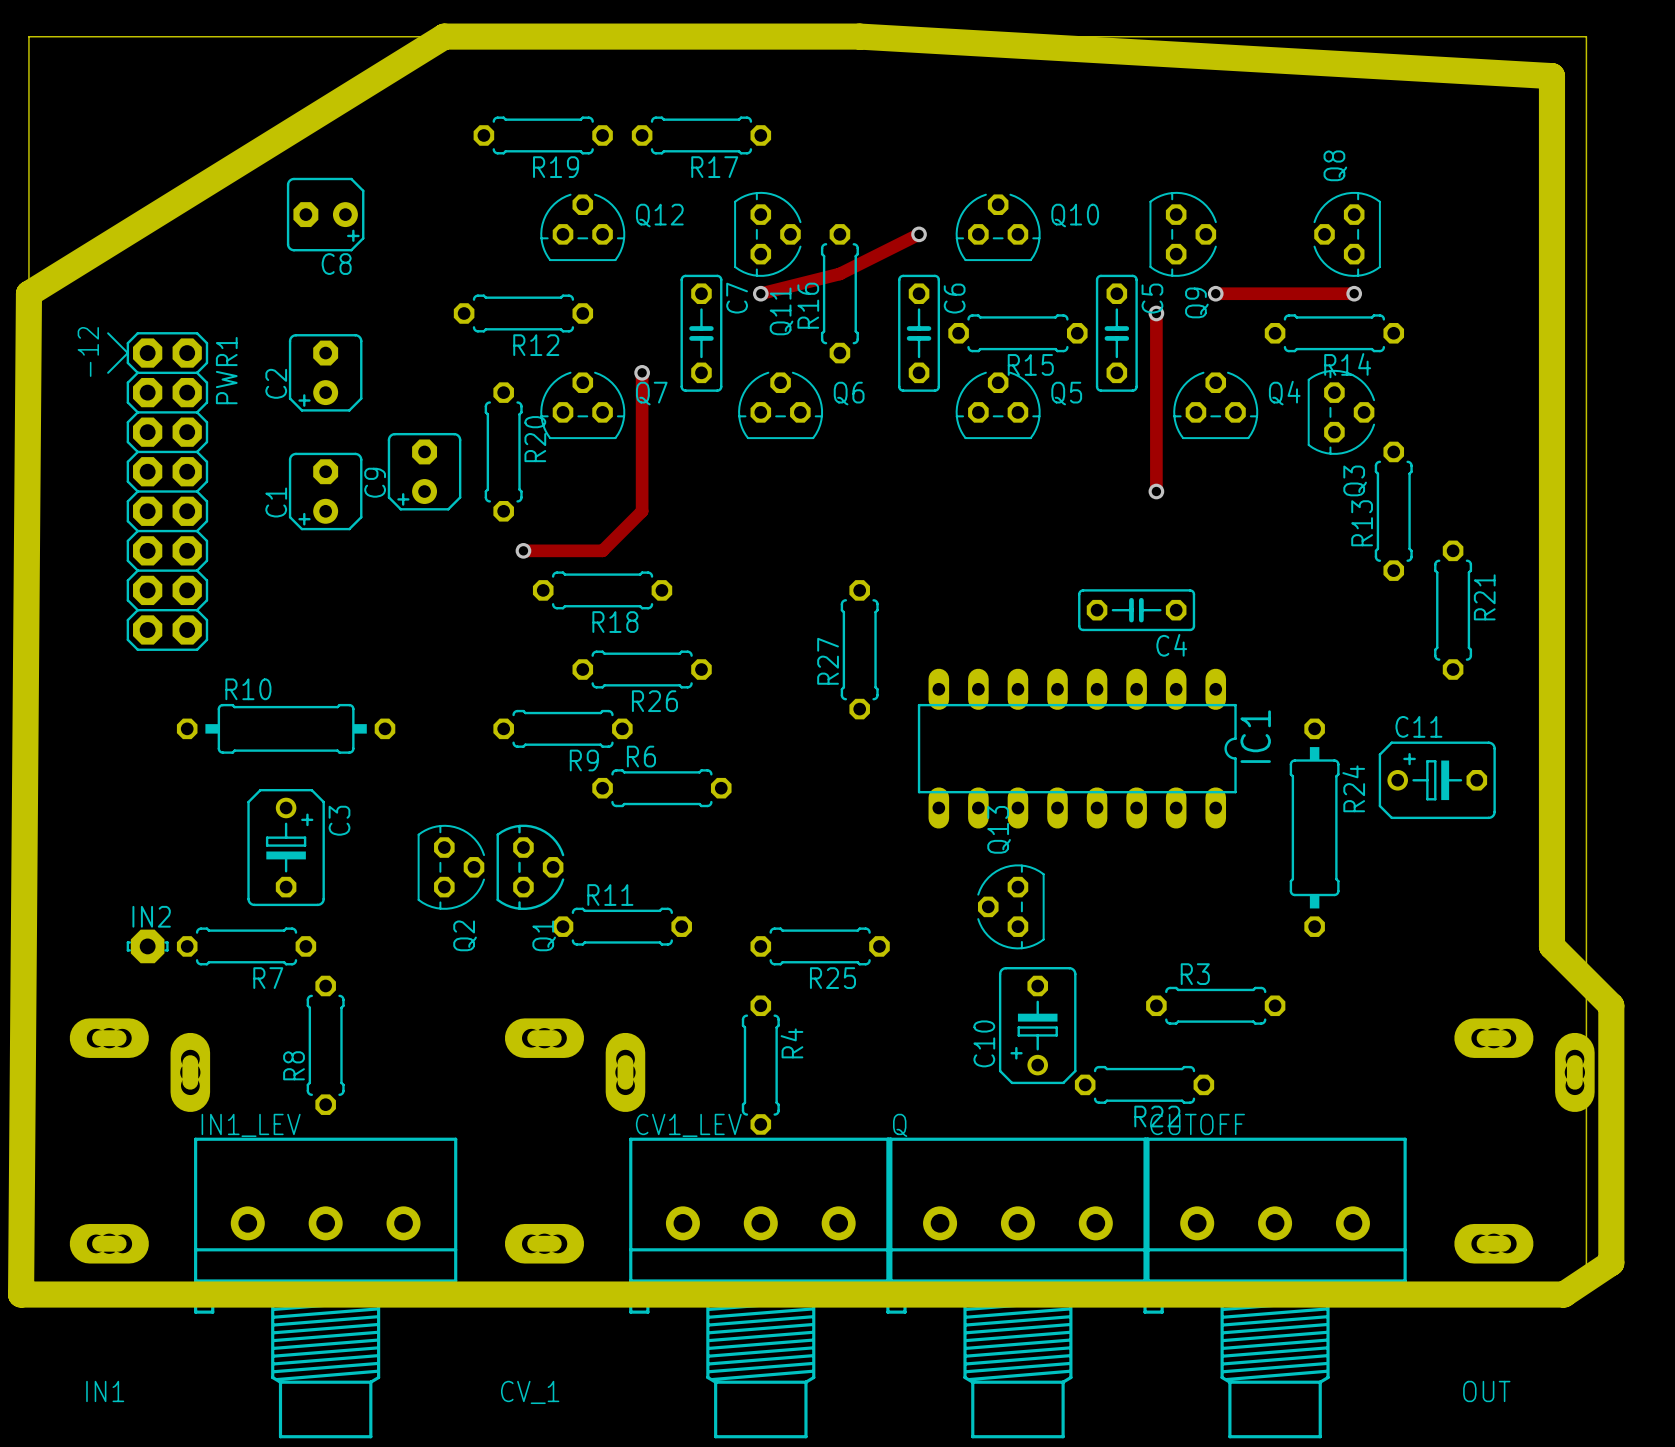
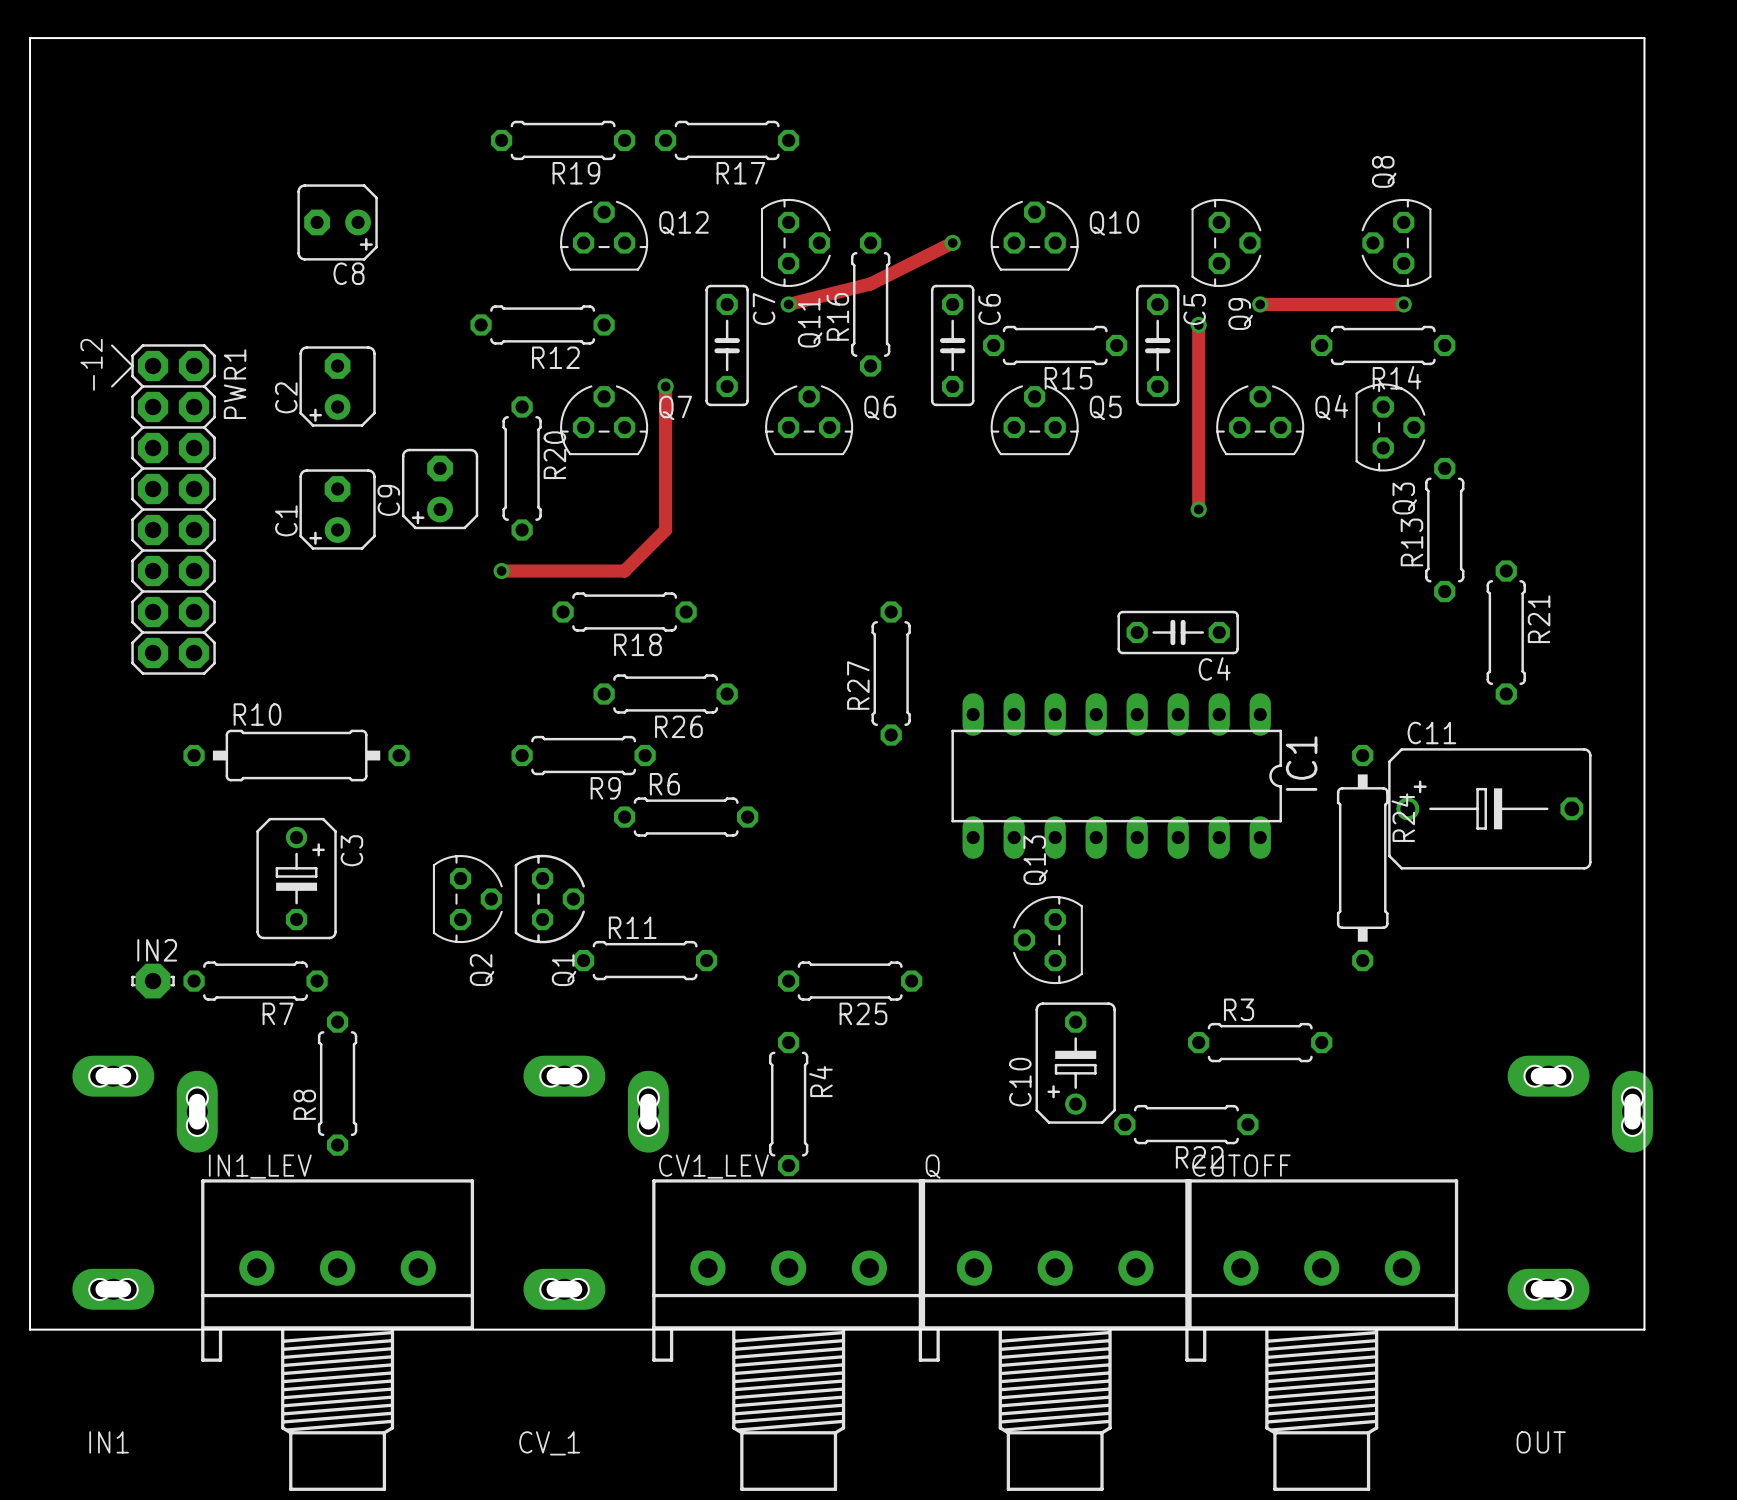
board edge: (444, 36) (28, 293) (21, 1294) (1563, 1294) (1611, 1262) (1611, 1005) (1551, 946) (1551, 76) (859, 36) (444, 36) -> none
track: none -> (501, 571) (542, 571)
via position: (523, 550) -> (501, 571)
C11 name position: C11 (1418, 726) -> C11 (1431, 732)
C11 footprint: [1378, 741, 1496, 820] -> [1388, 748, 1592, 870]

